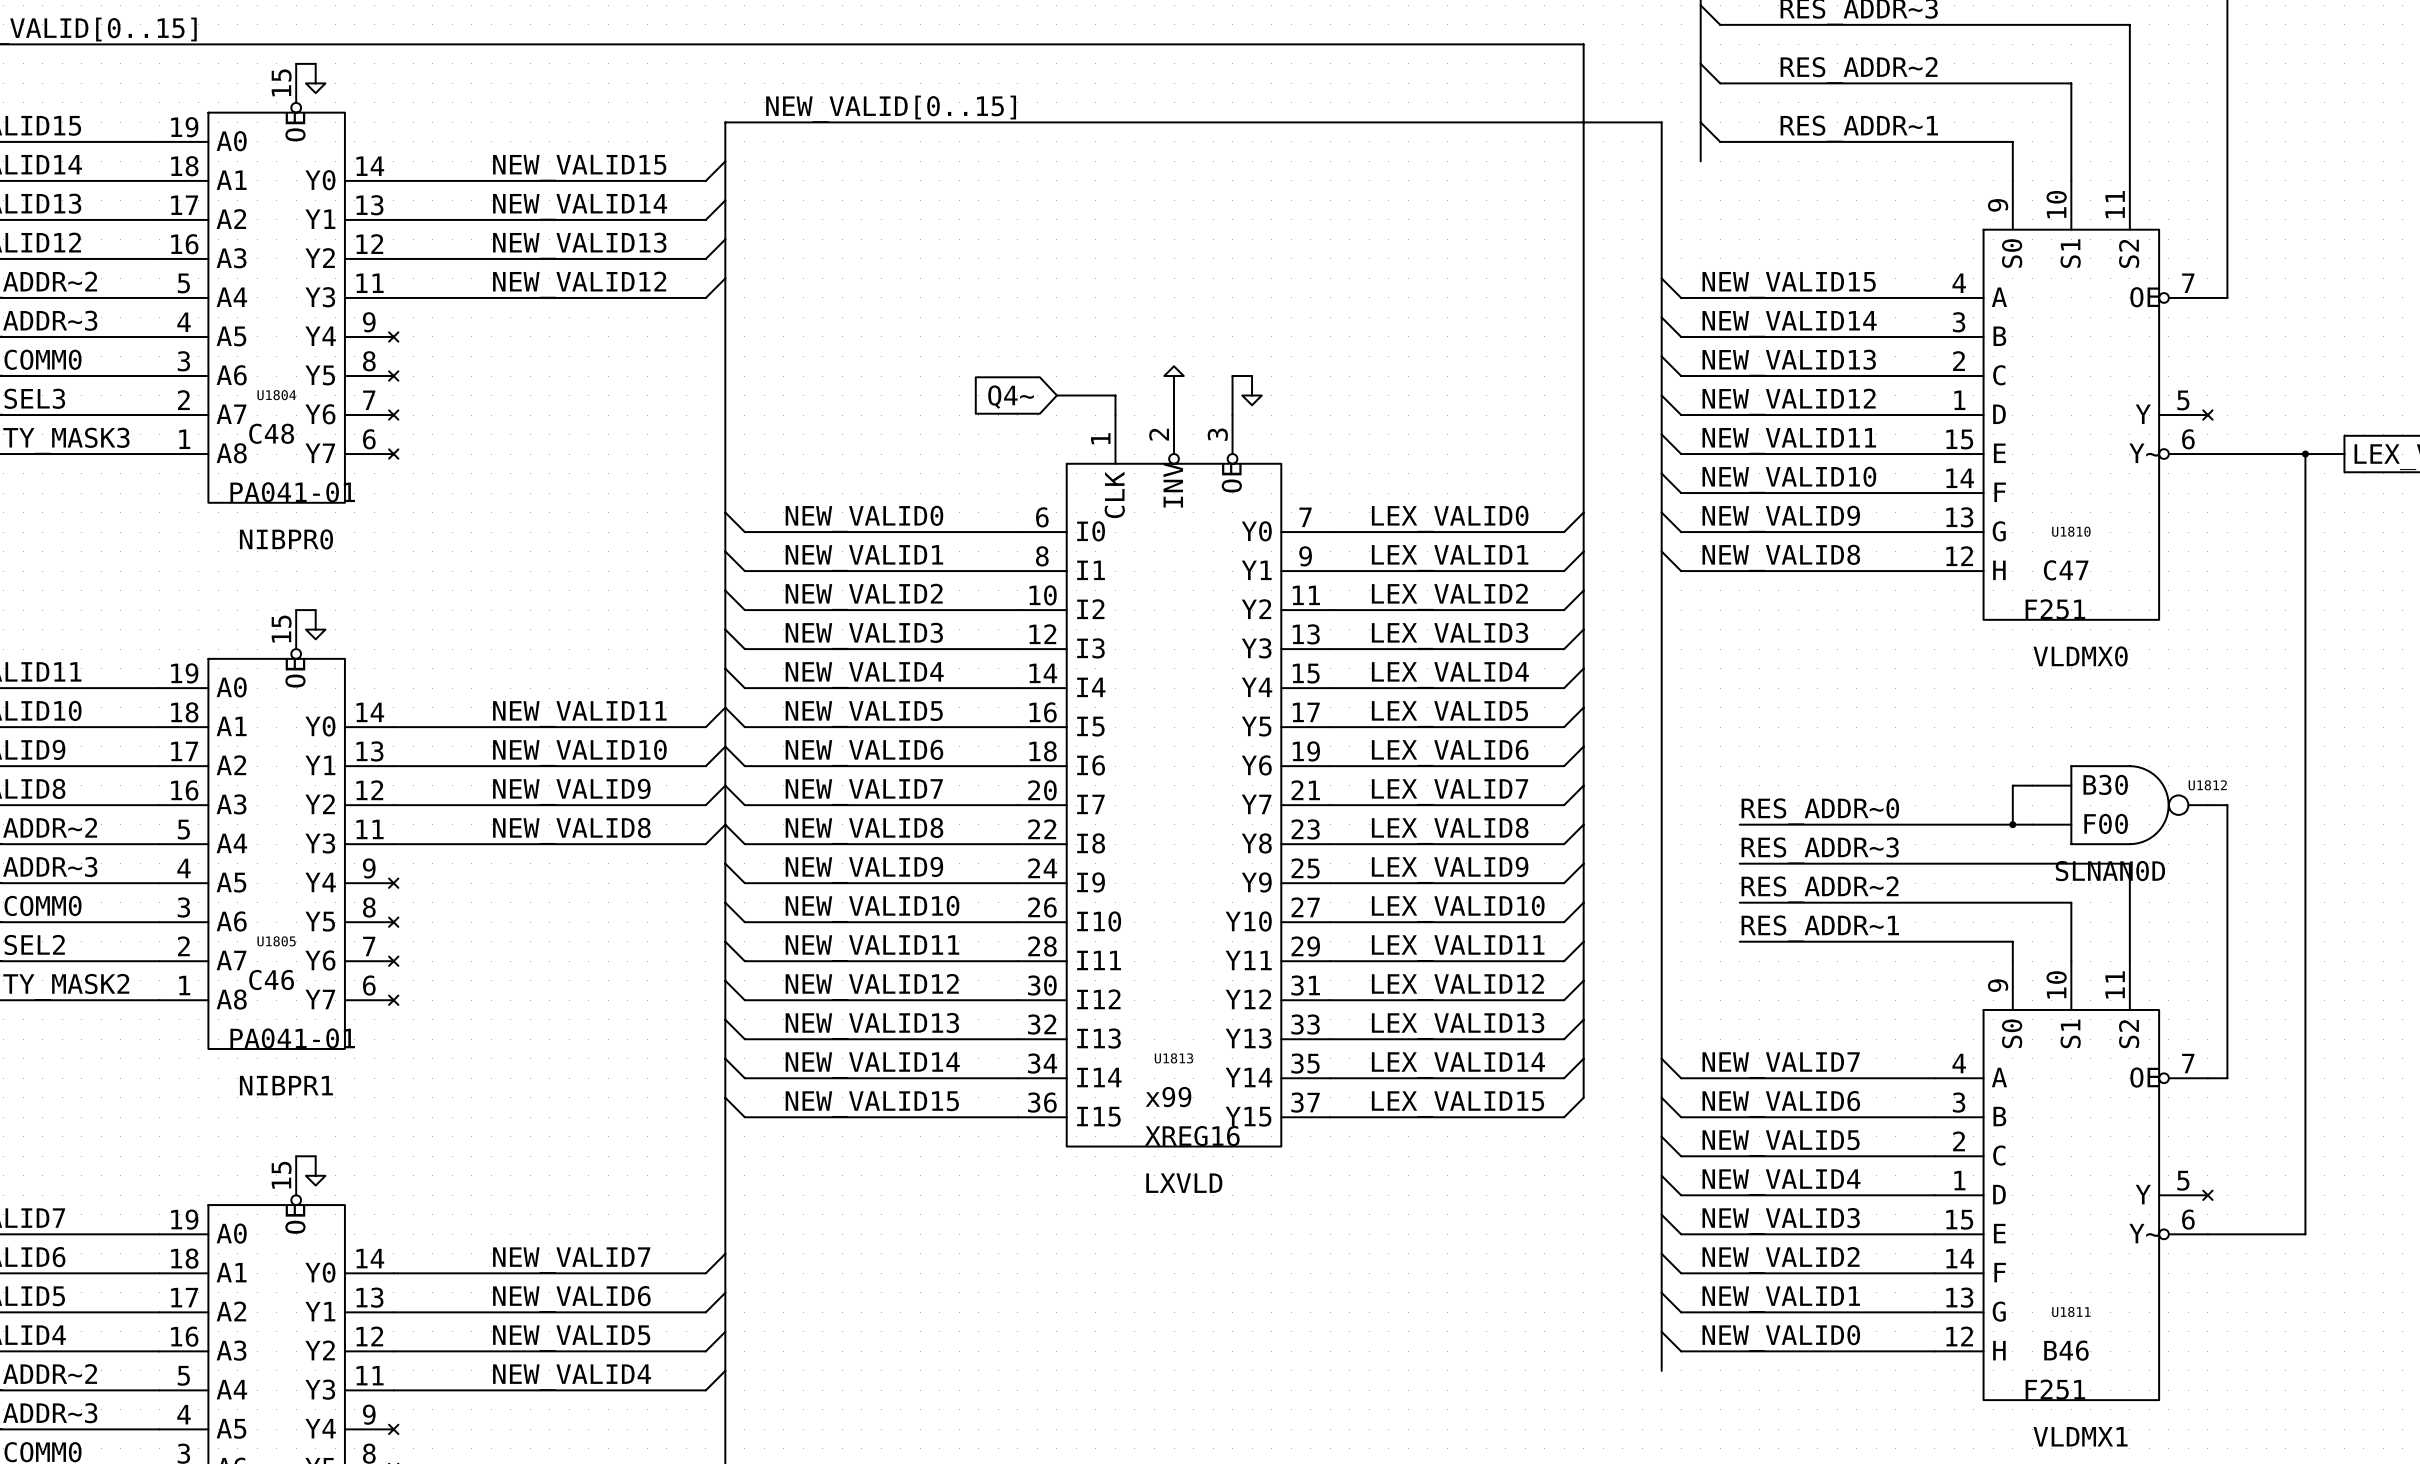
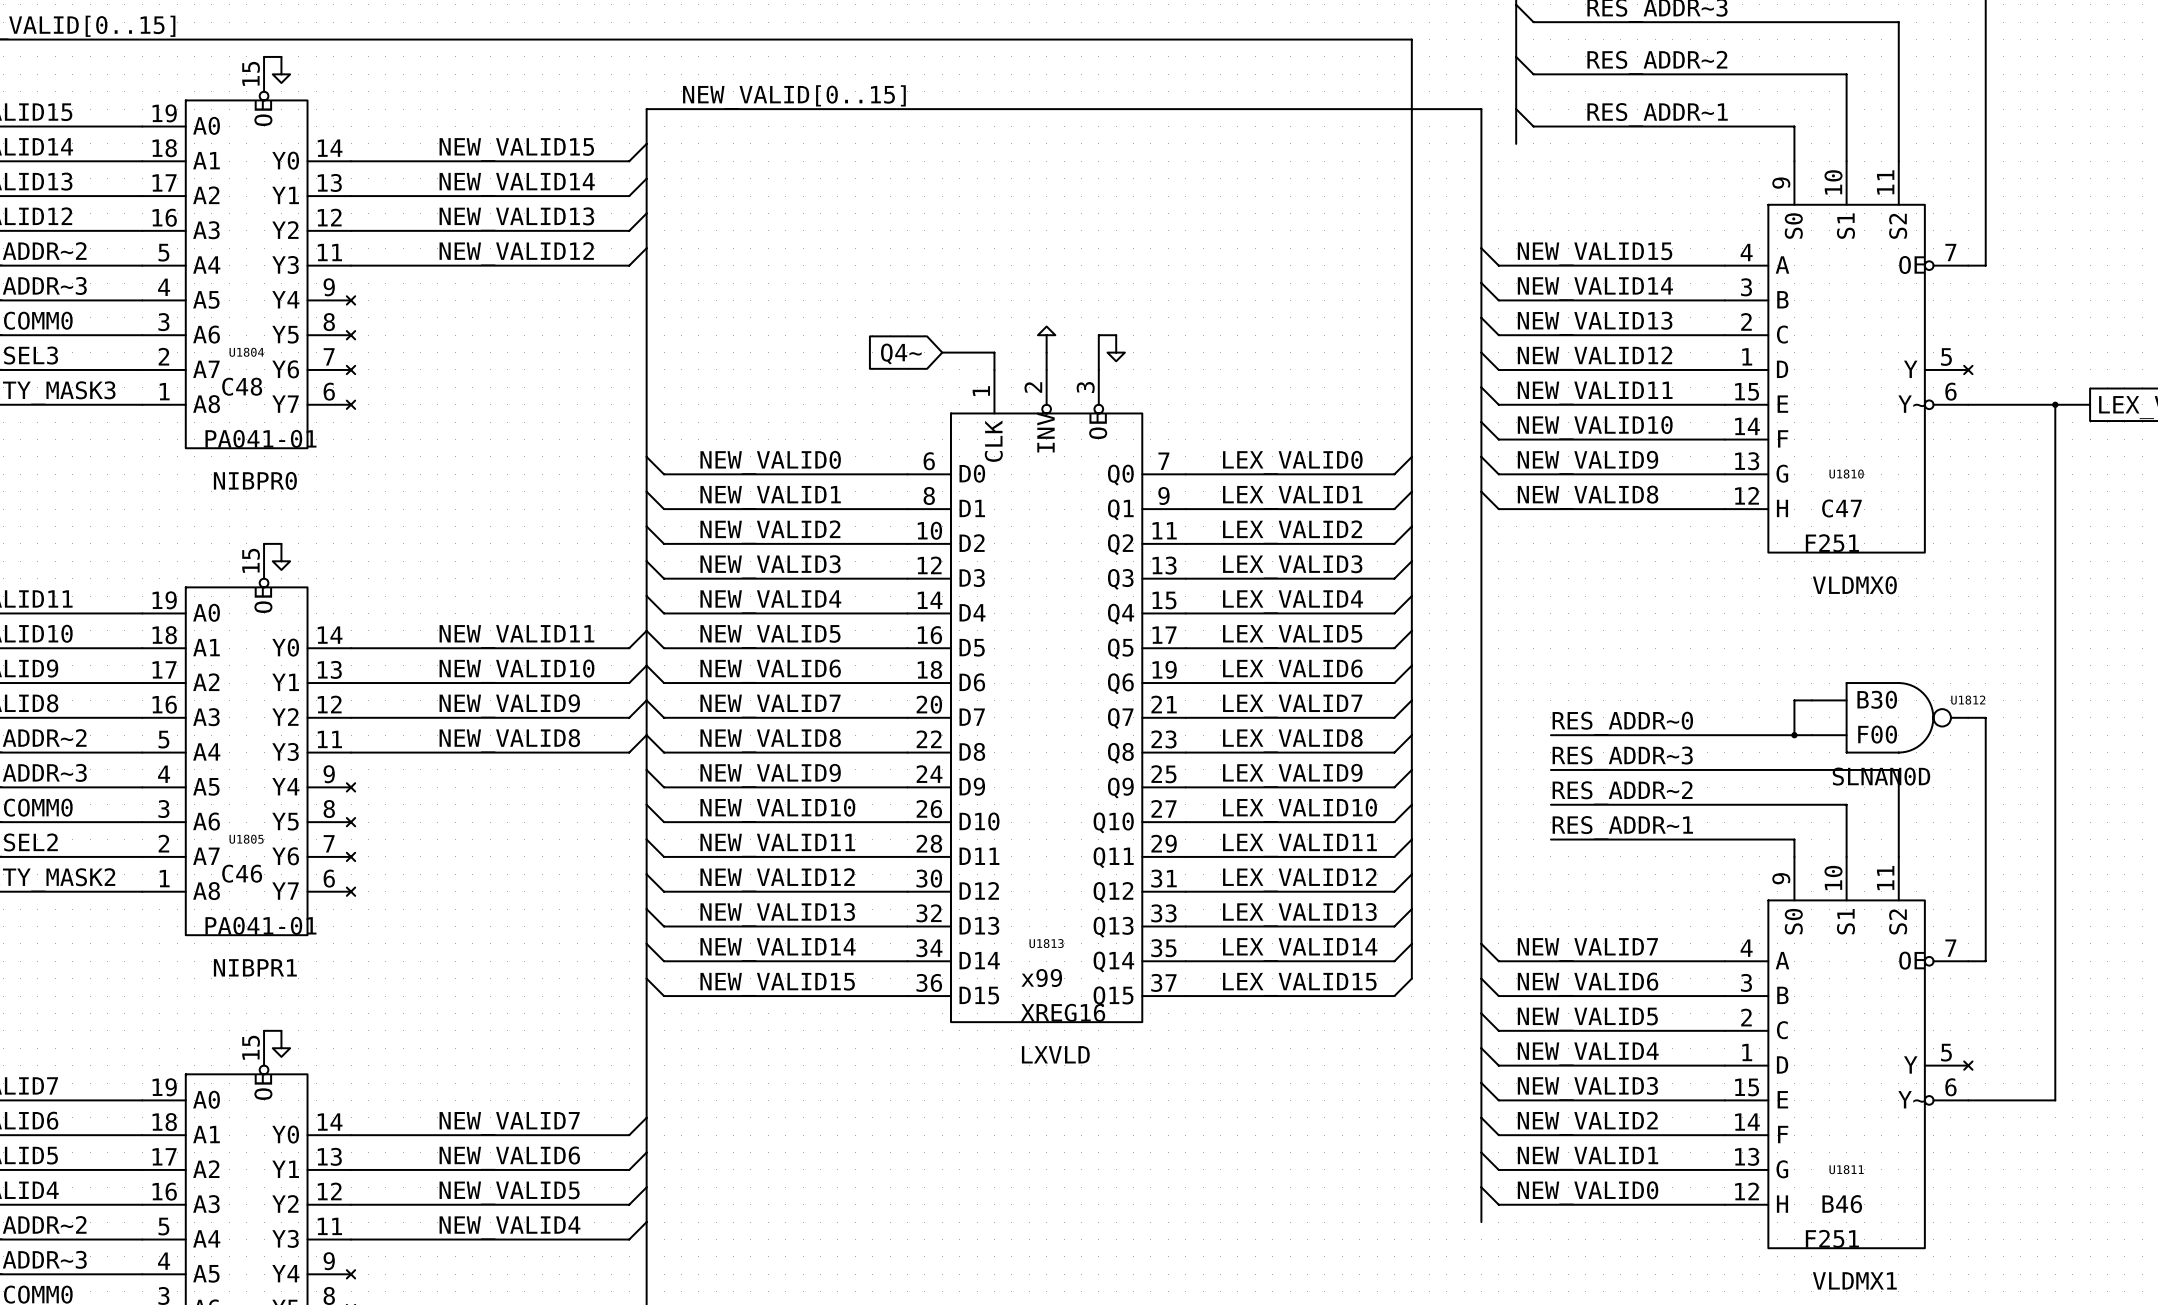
U1813 symbol: [1017, 415, 1331, 1147] -> [907, 369, 1186, 1023]

